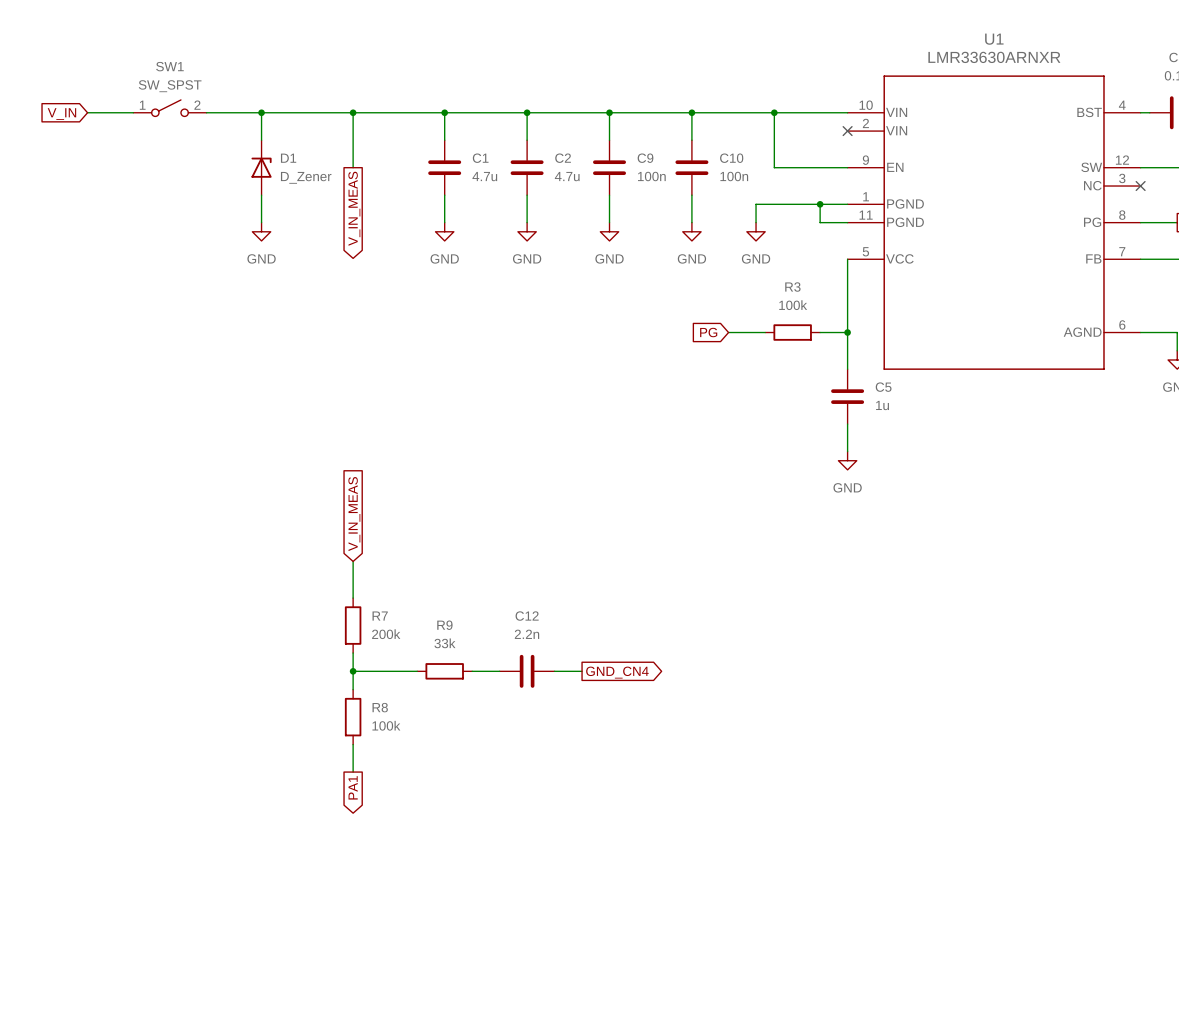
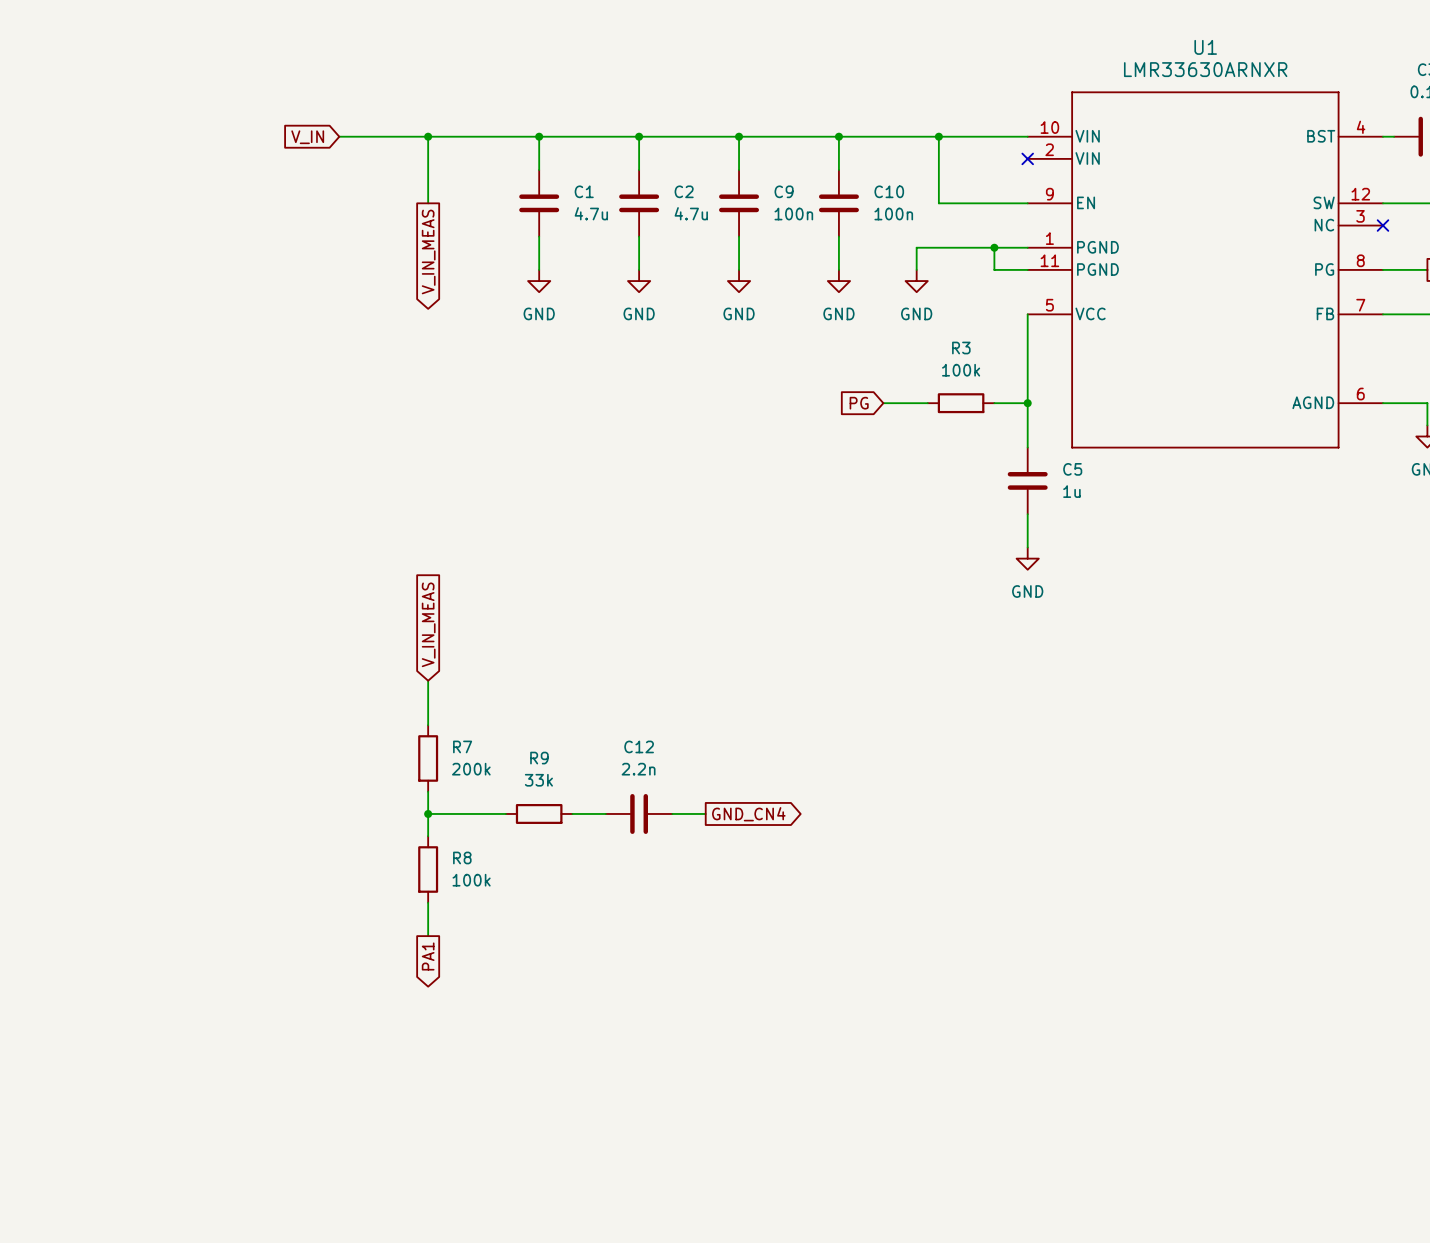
SW1: SW_SPST (169, 108) -> none
wire: (87, 112) (133, 112) -> none
wire: (206, 112) (279, 112) -> none
wire: (261, 112) (261, 140) -> none
junction: (261, 112) -> none
global label: V_IN (61, 114) -> none
global label: none -> V_IN (307, 137)
D1: D_Zener (261, 167) -> none
wire: (261, 195) (261, 222) -> none
power symbol: GND (261, 231) -> none

